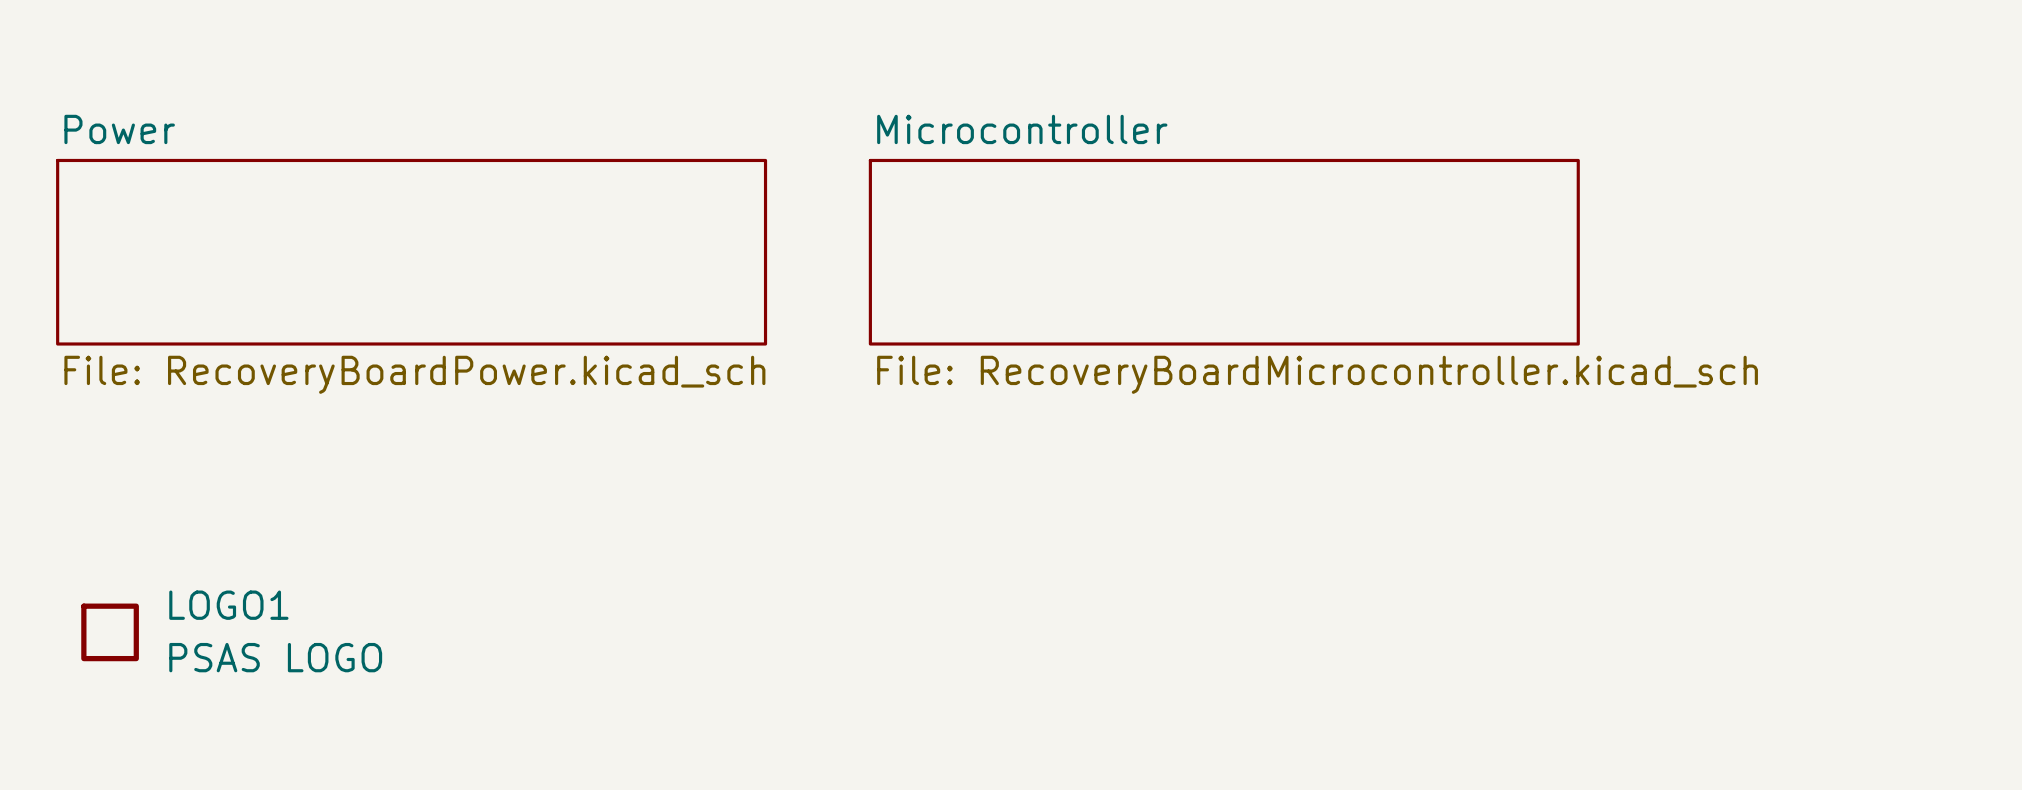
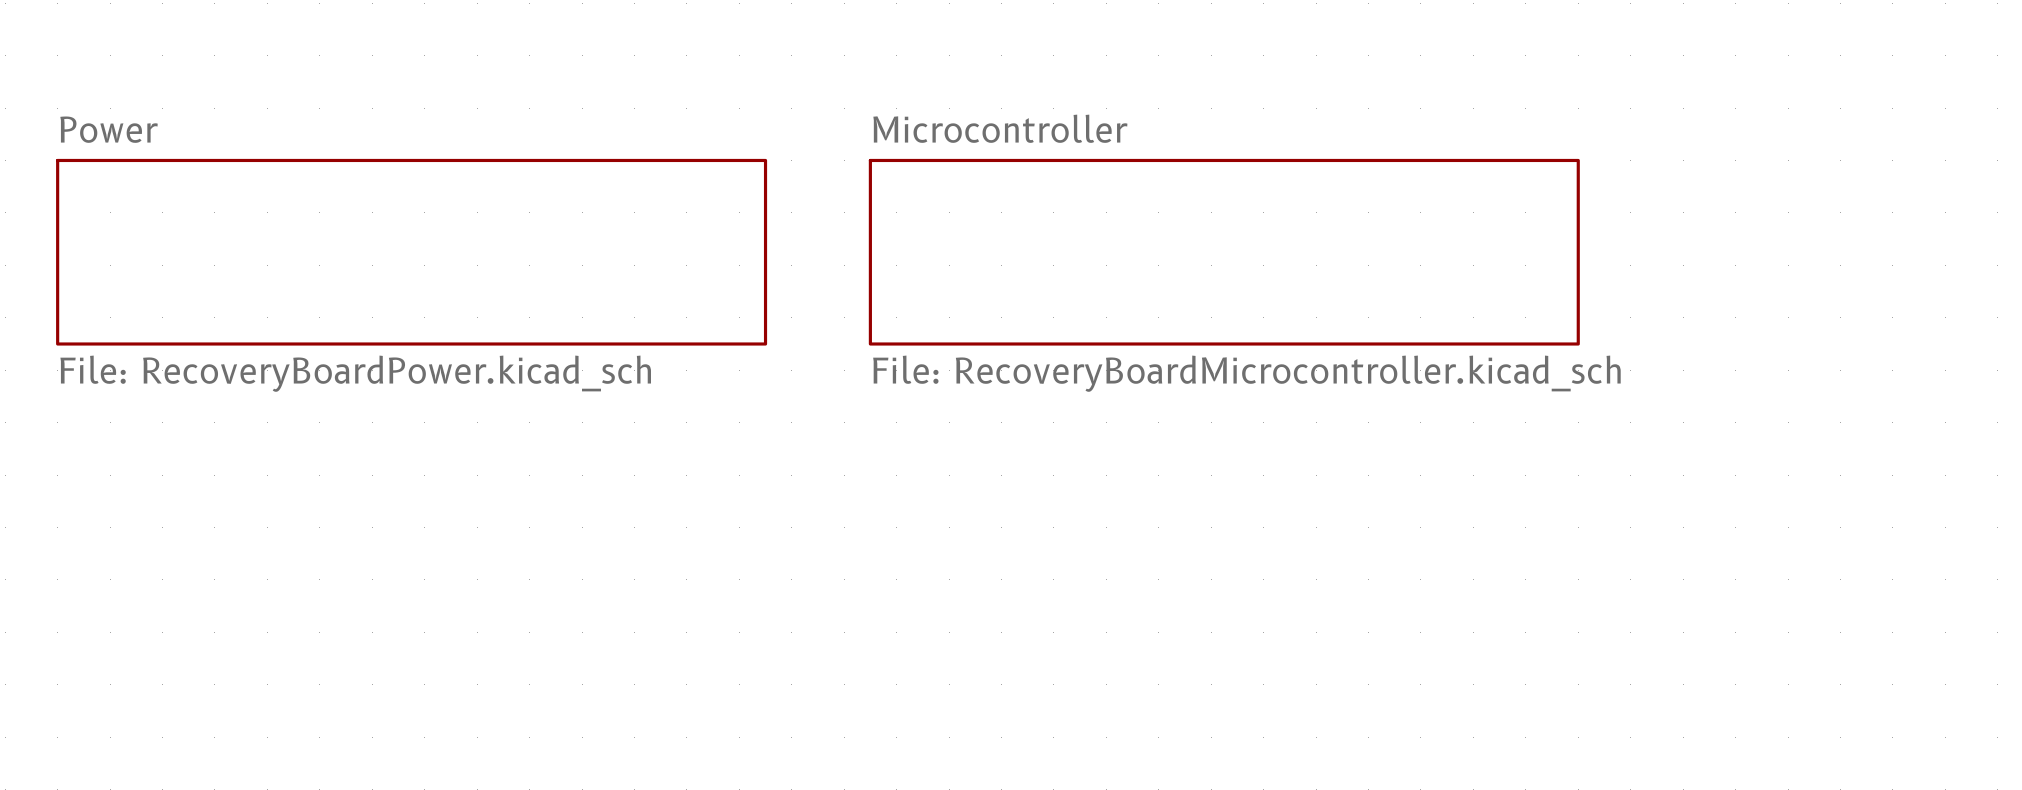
LOGO1: PSAS LOGO (110, 632) -> none

